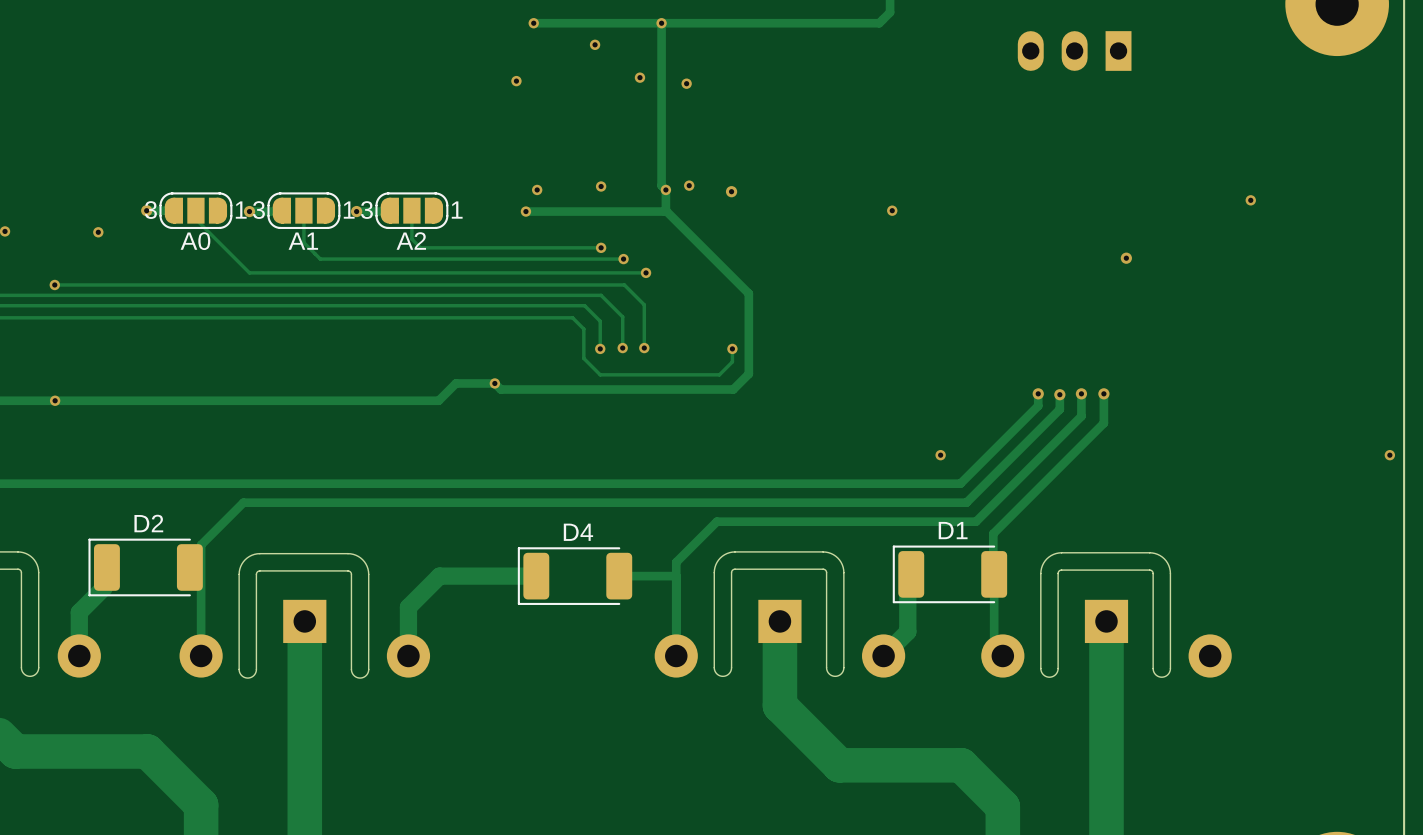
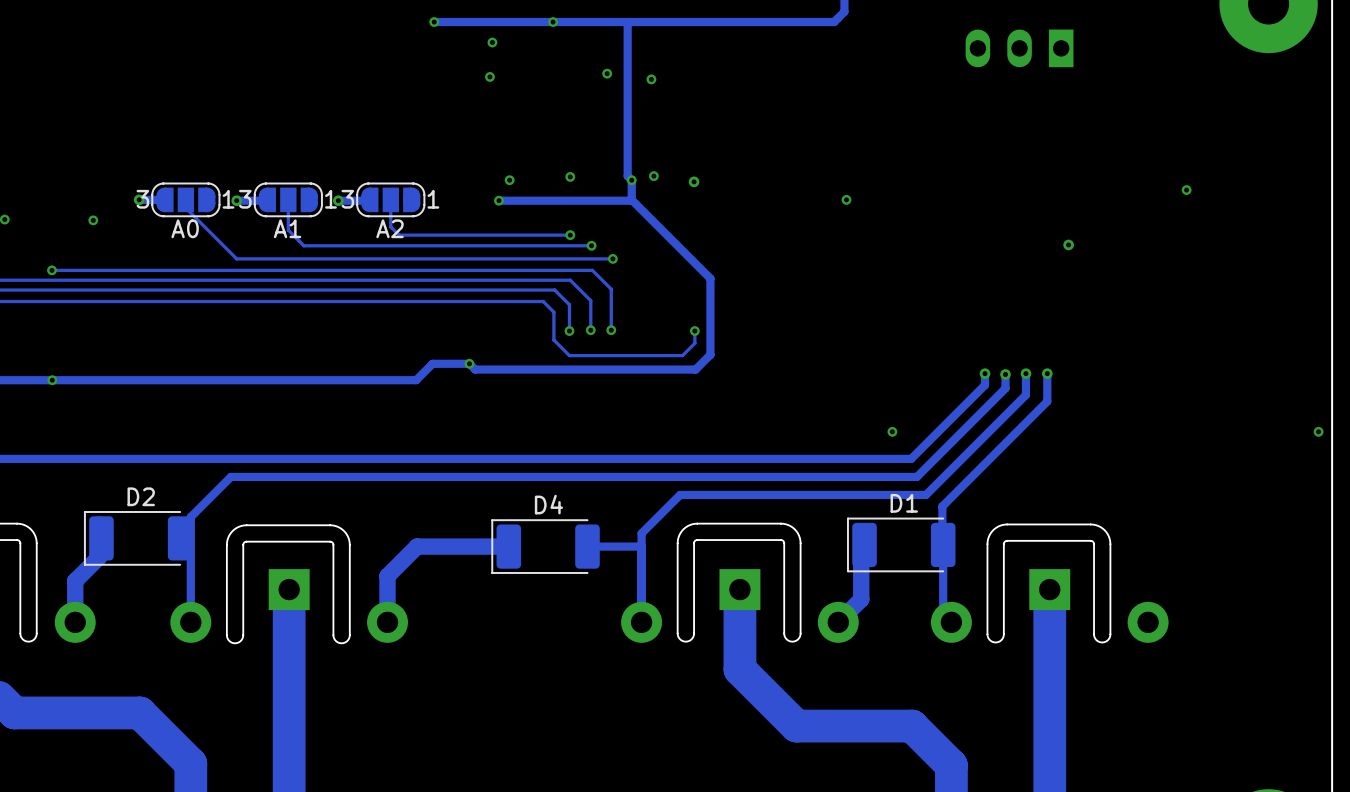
via: none -> (434, 22)
track: none -> (506, 22) (434, 22)
via: (533, 23) -> none
via: none -> (553, 22)
via: (661, 23) -> none
via: none -> (492, 42)
via: (595, 44) -> none

